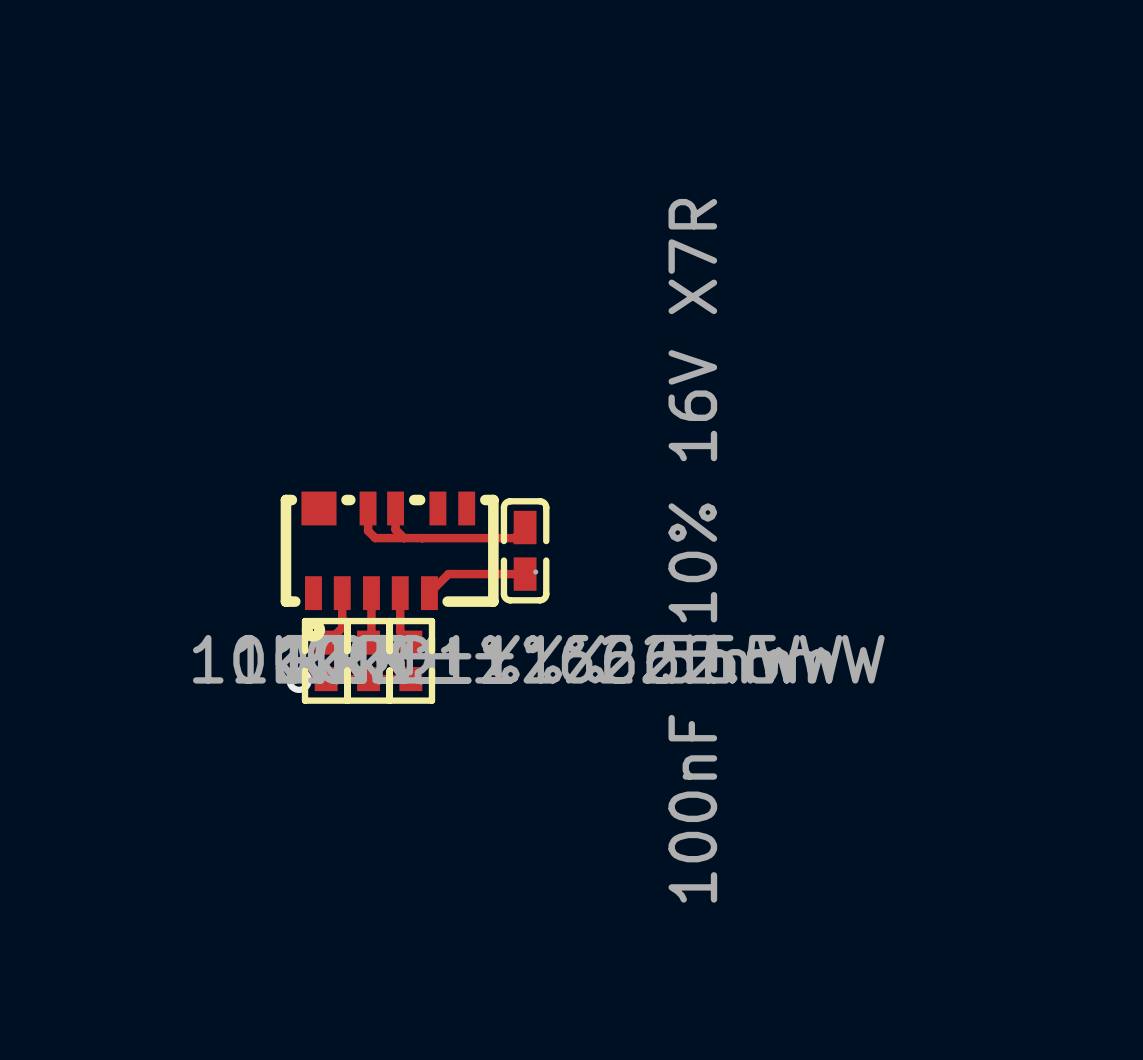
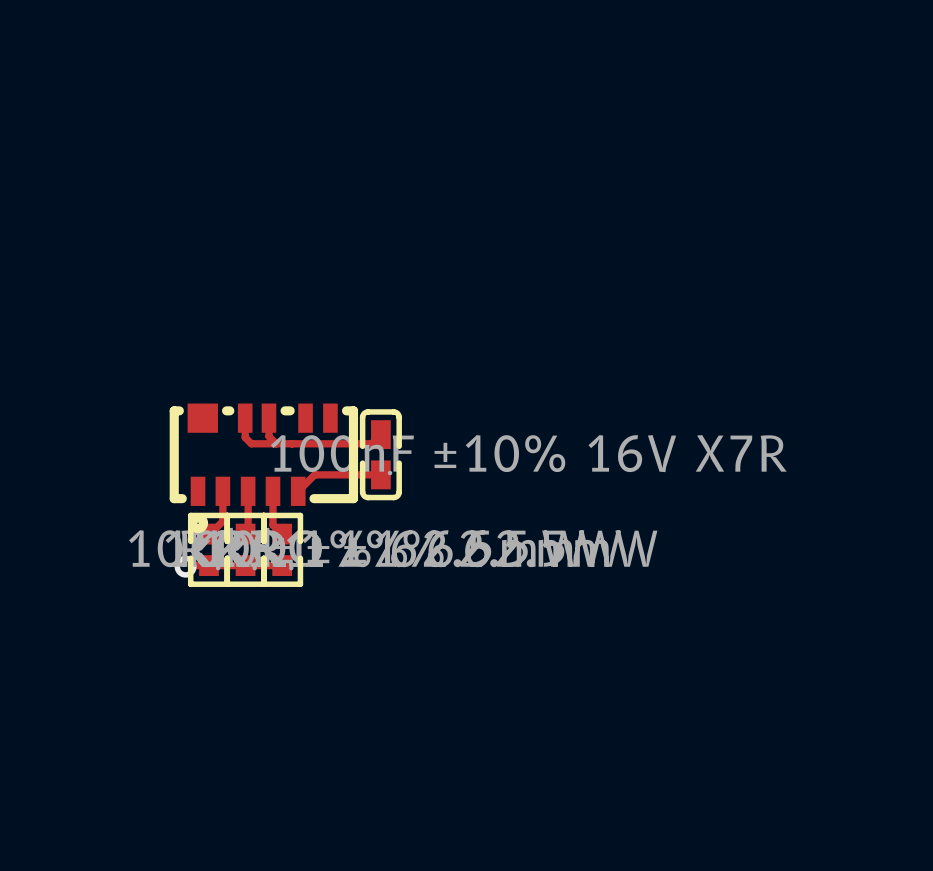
part value rotation: 0° (692, 550) -> 90° clockwise (528, 453)

